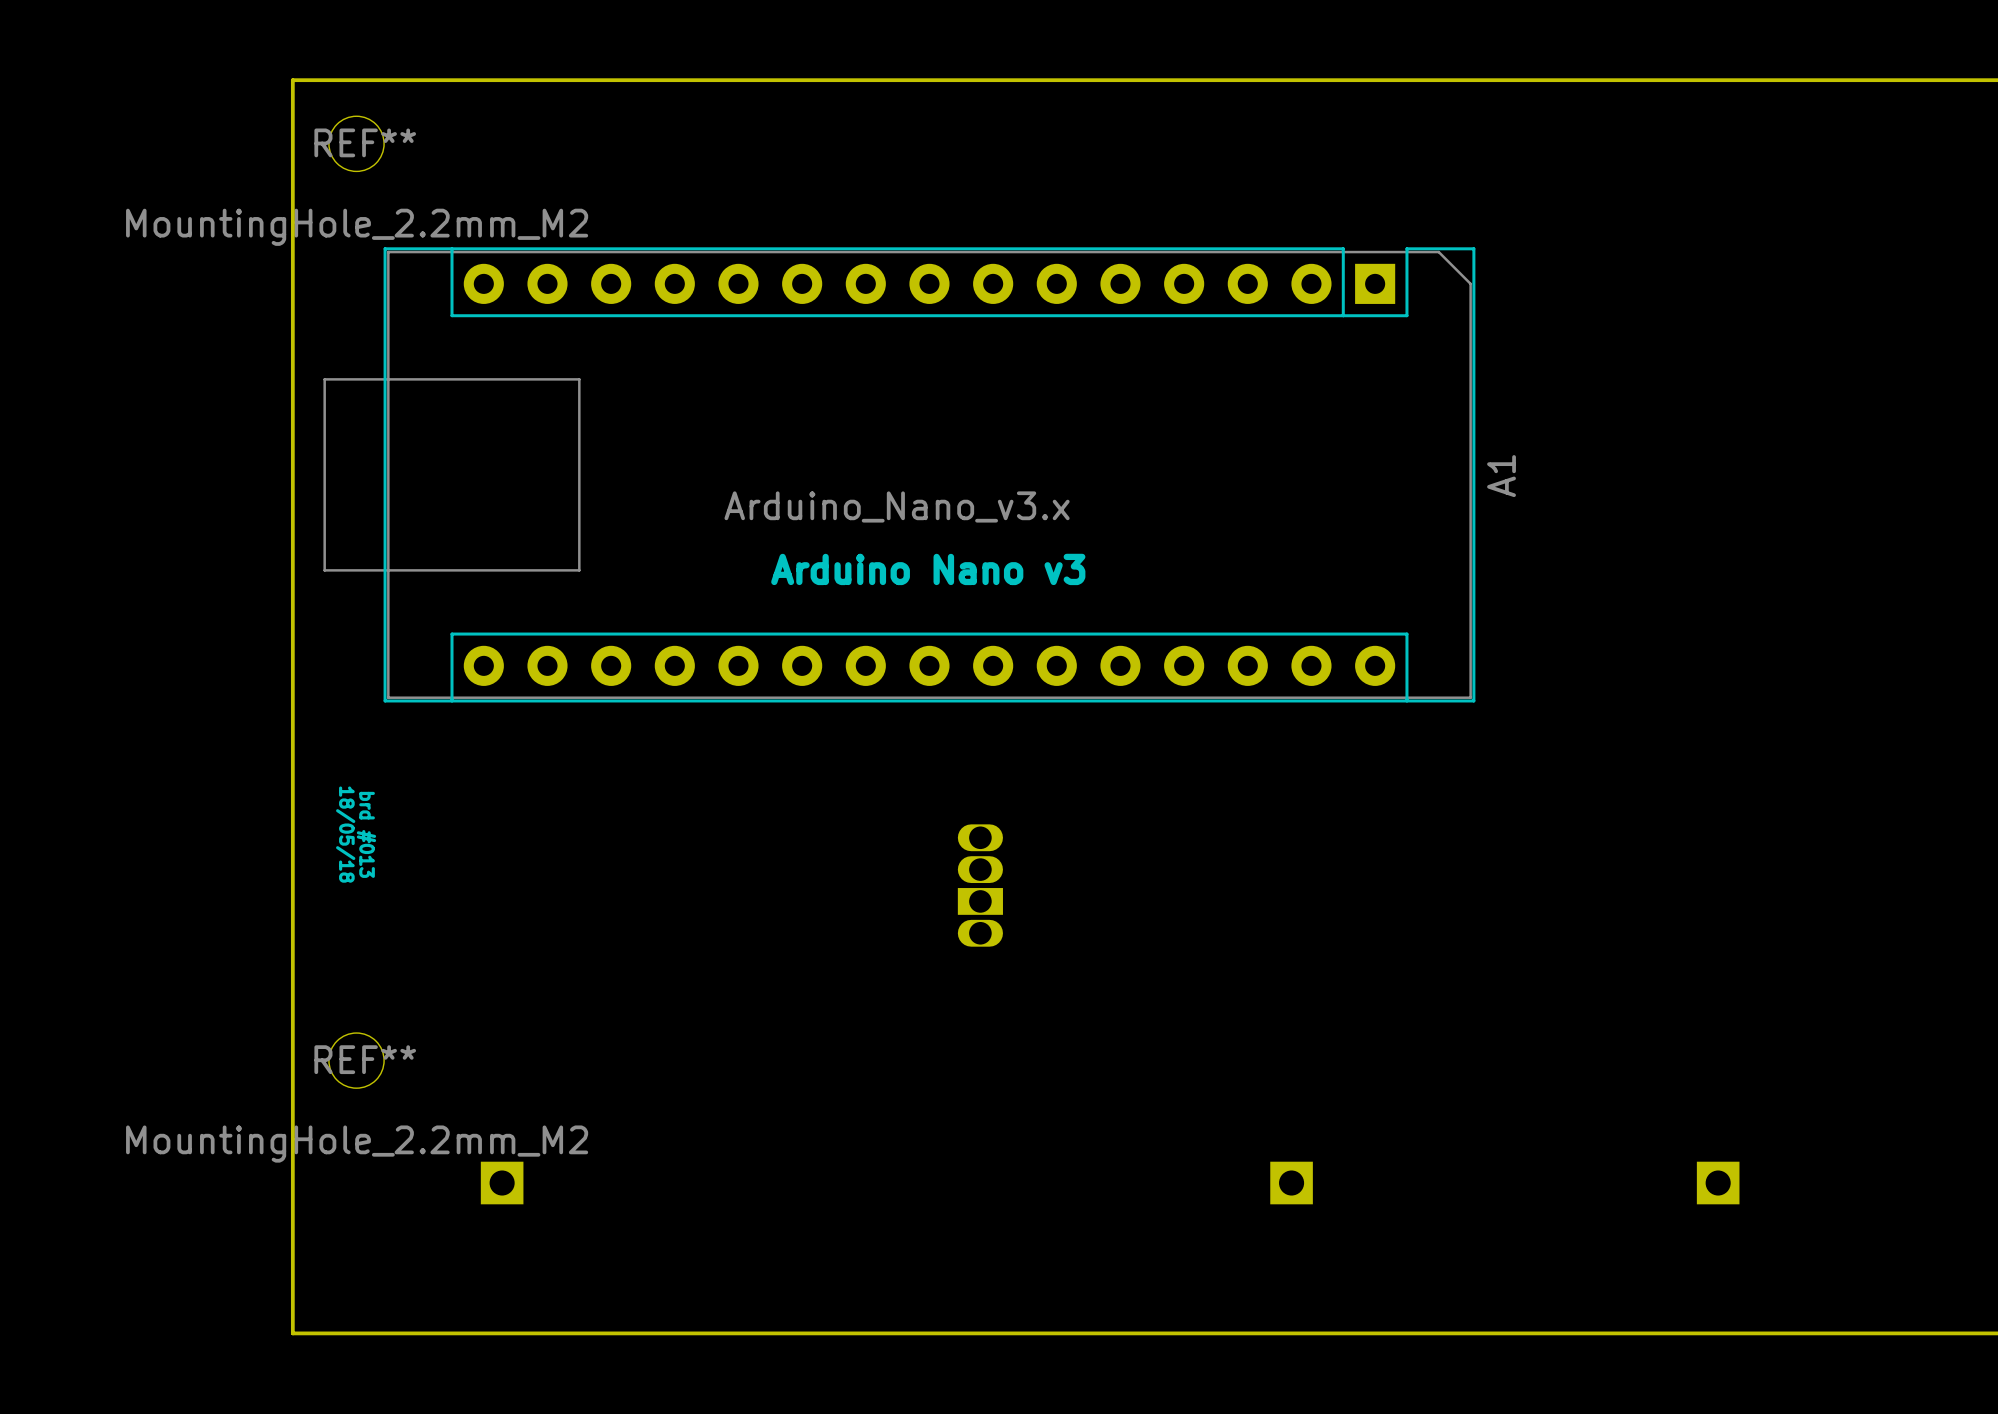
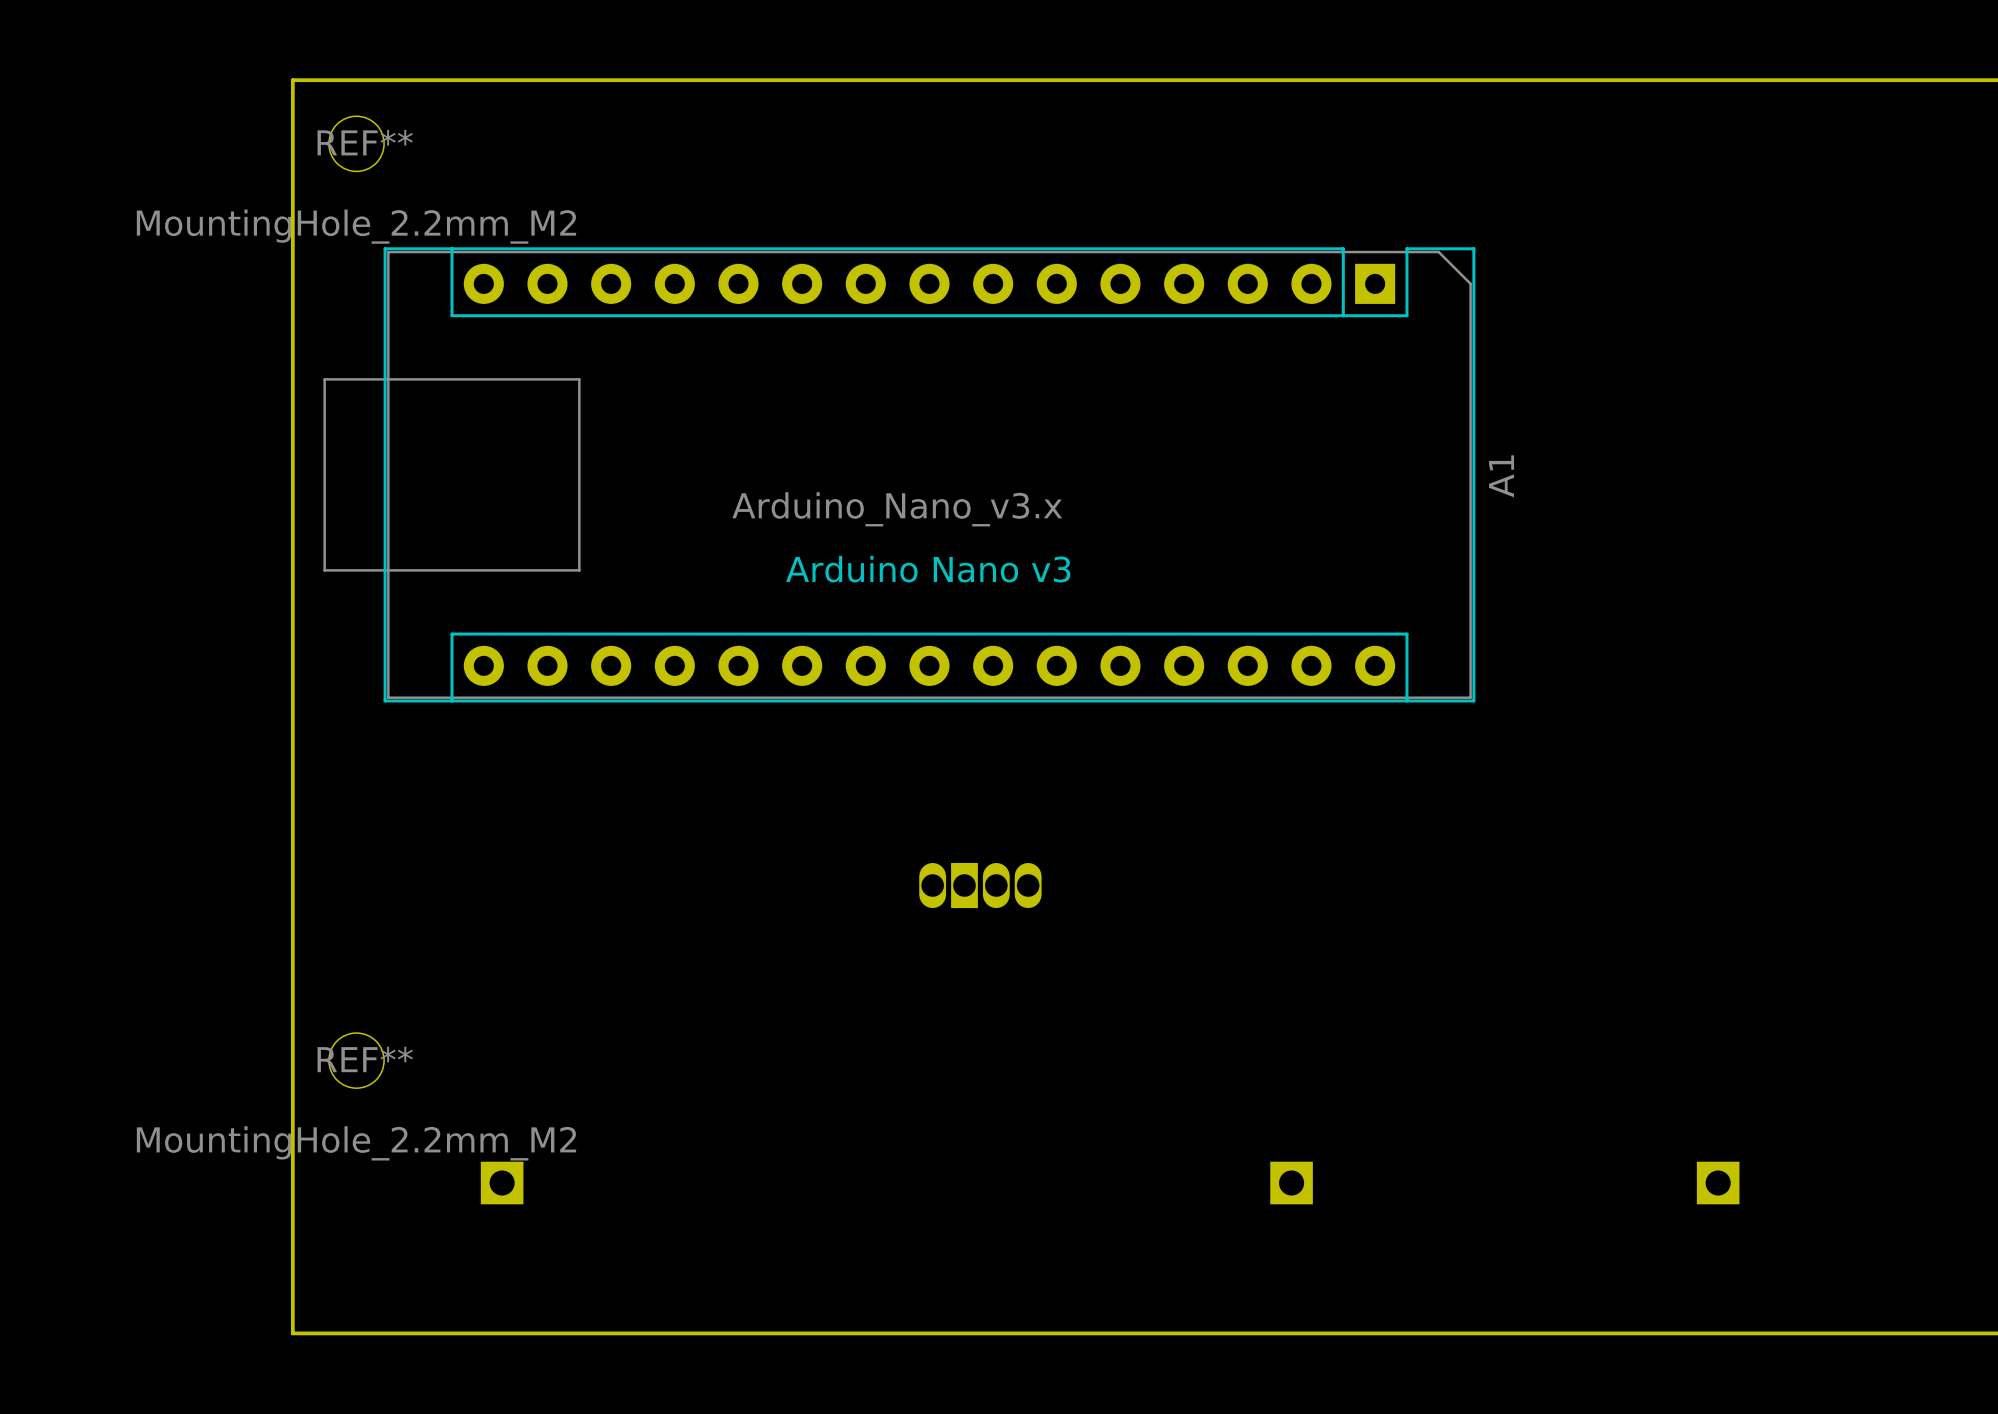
text: 18/05/18 (345, 834) -> none
text: brd #013 (366, 834) -> none
part rotation: 0° (980, 885) -> 90° clockwise (980, 885)

